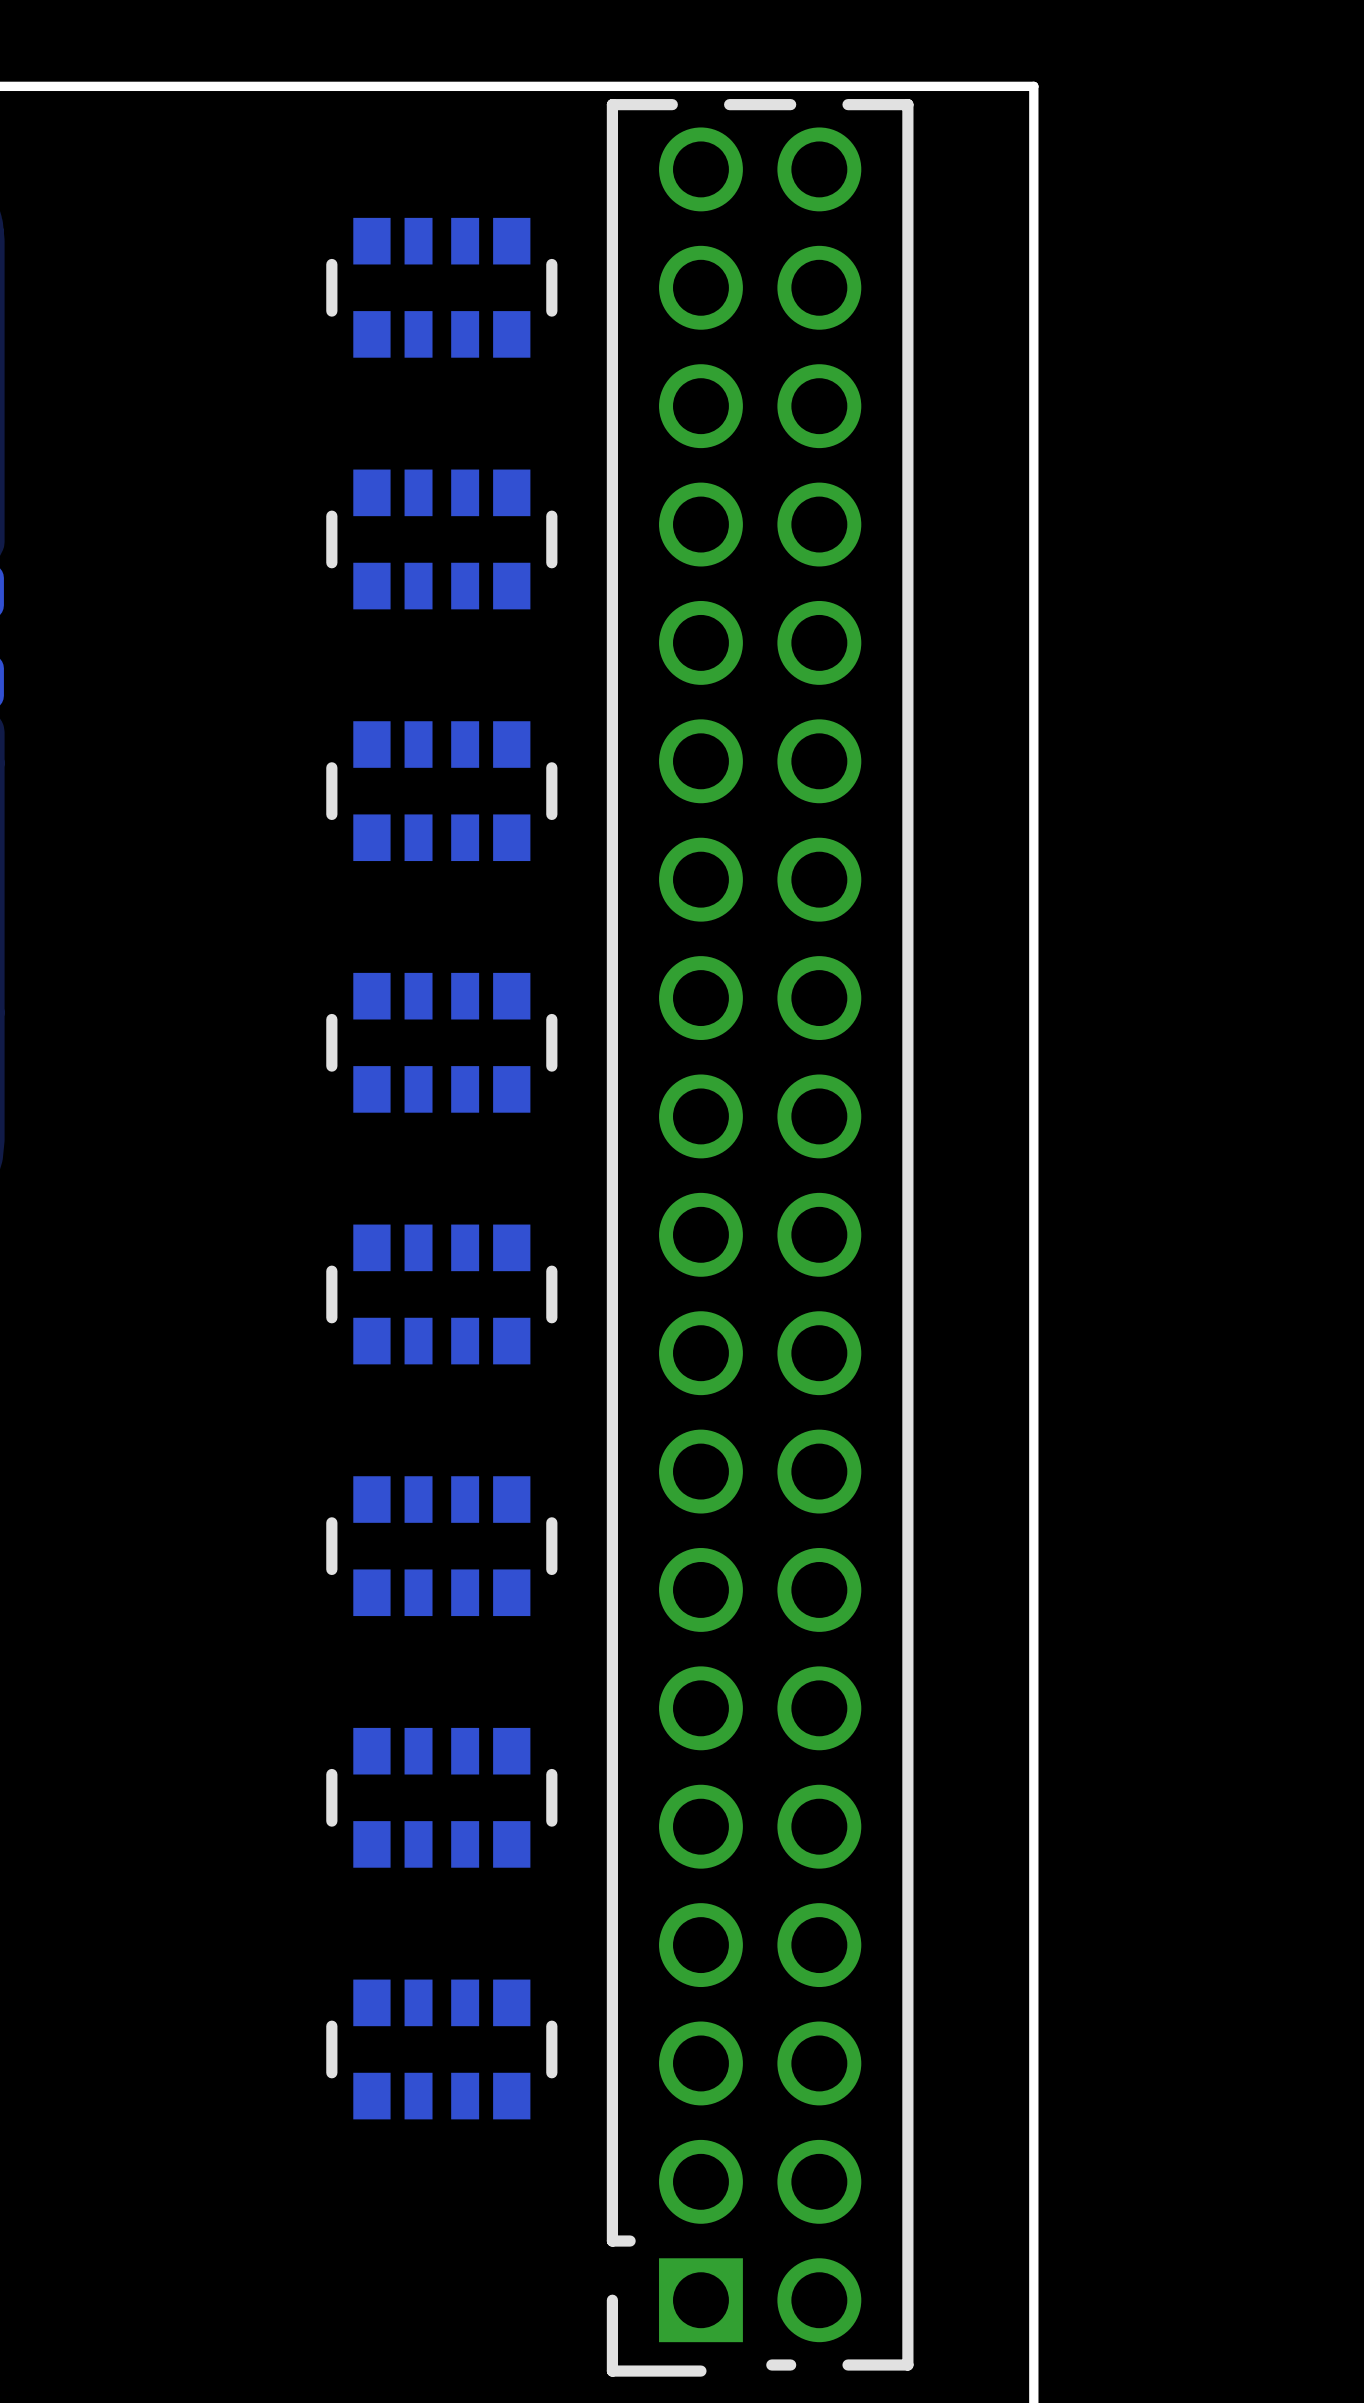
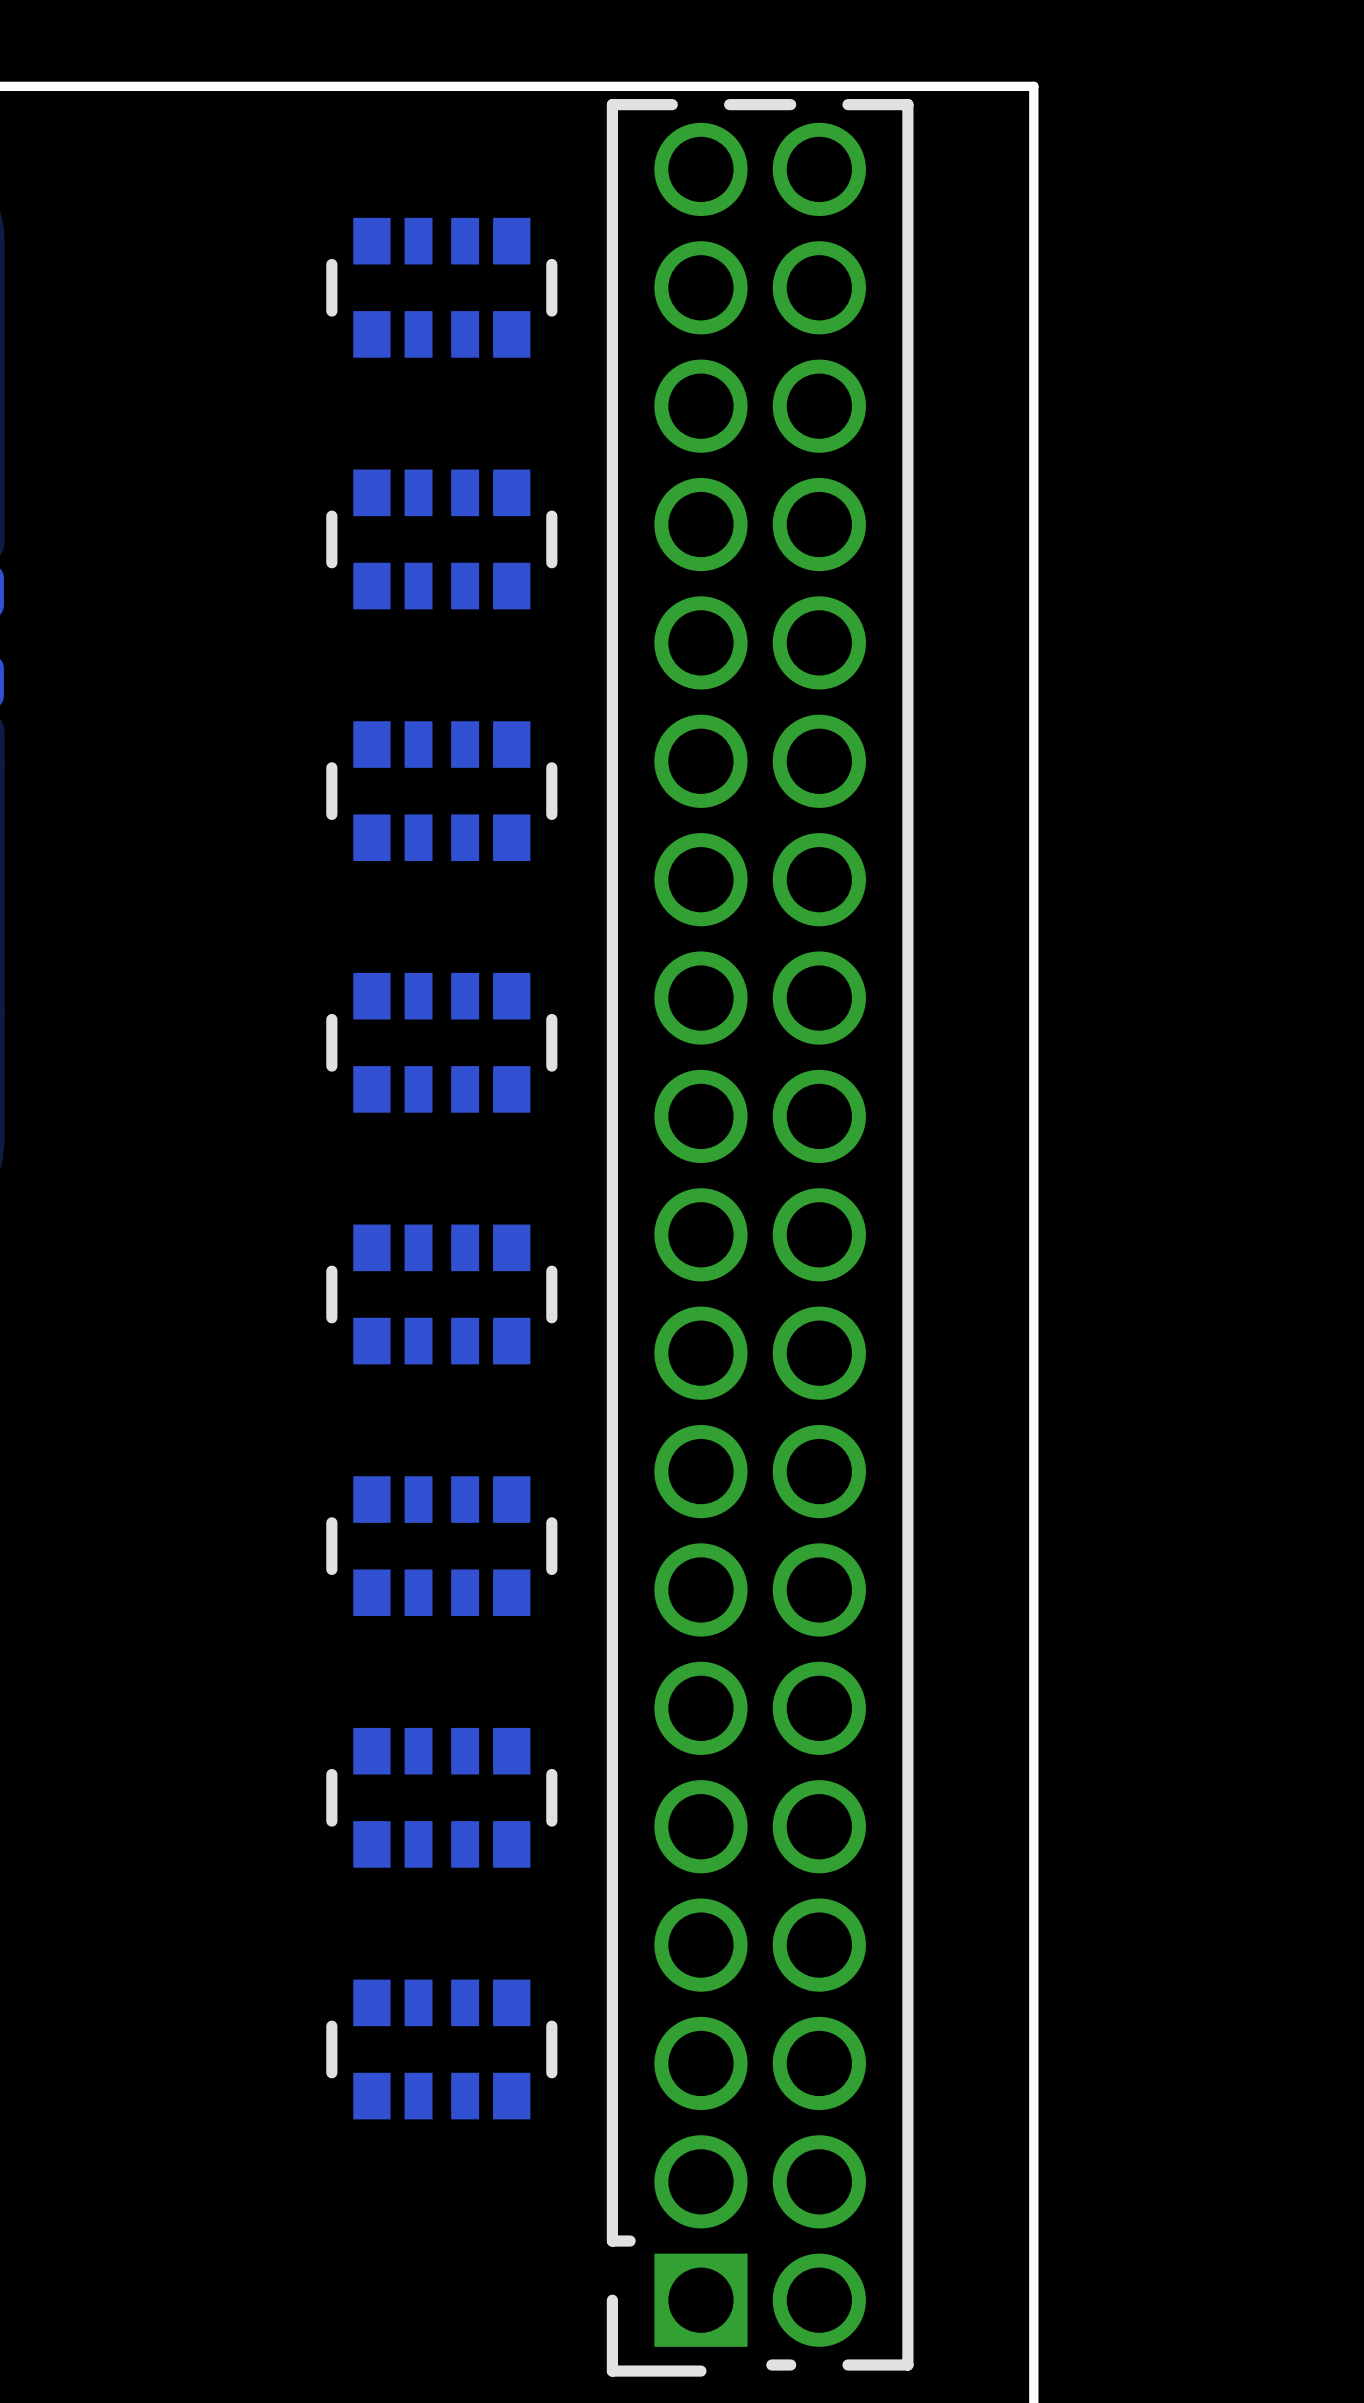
part footprint: [606, 99, 914, 2377] -> [606, 99, 914, 2377]

